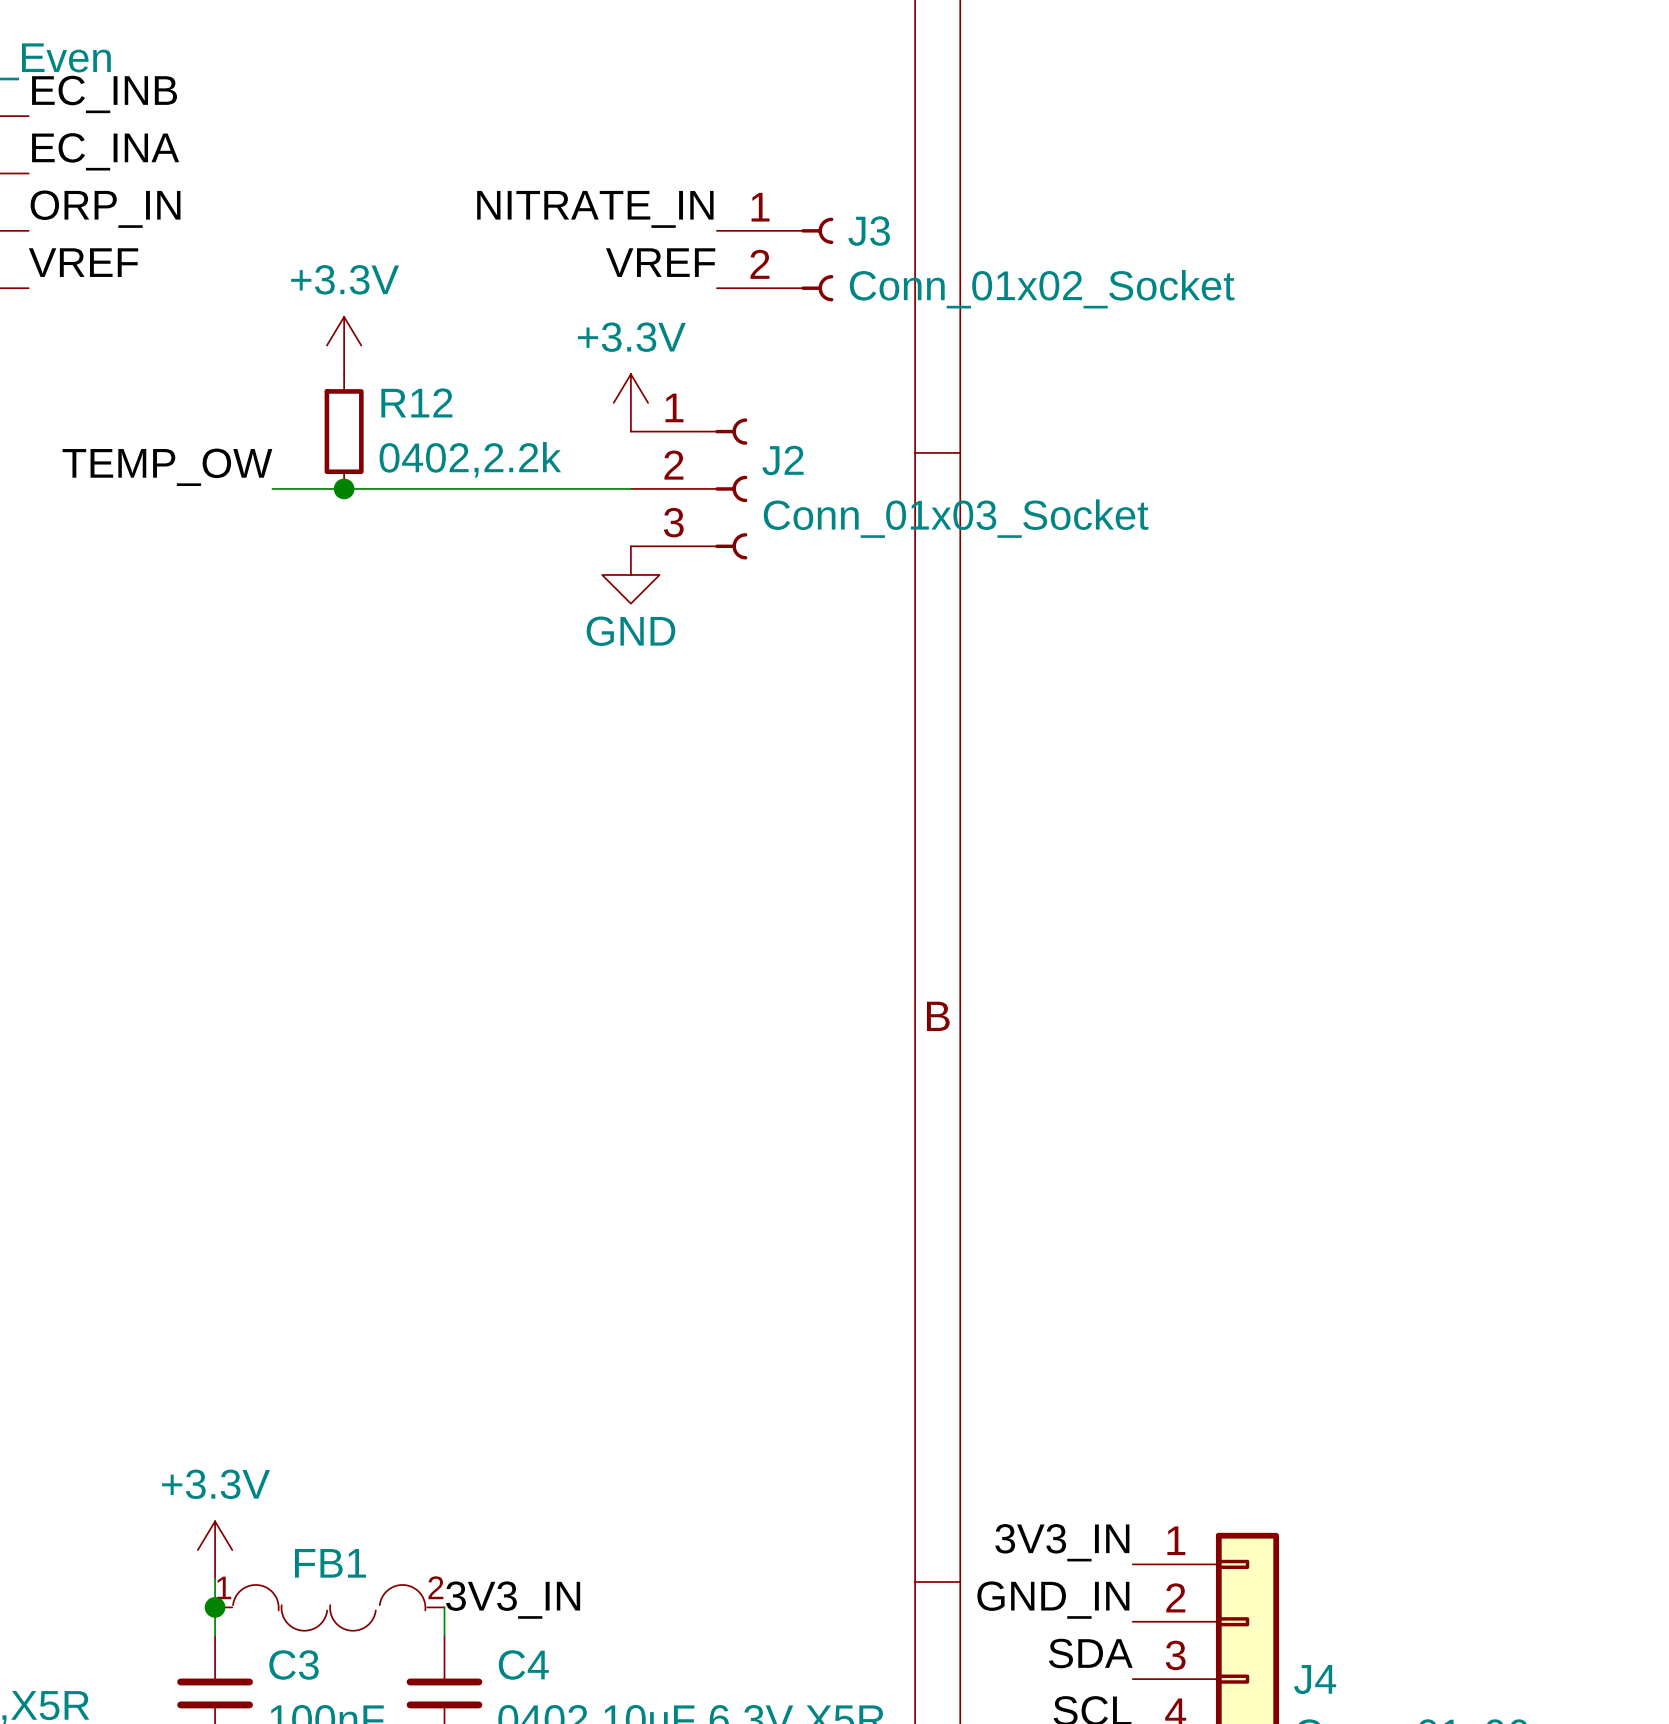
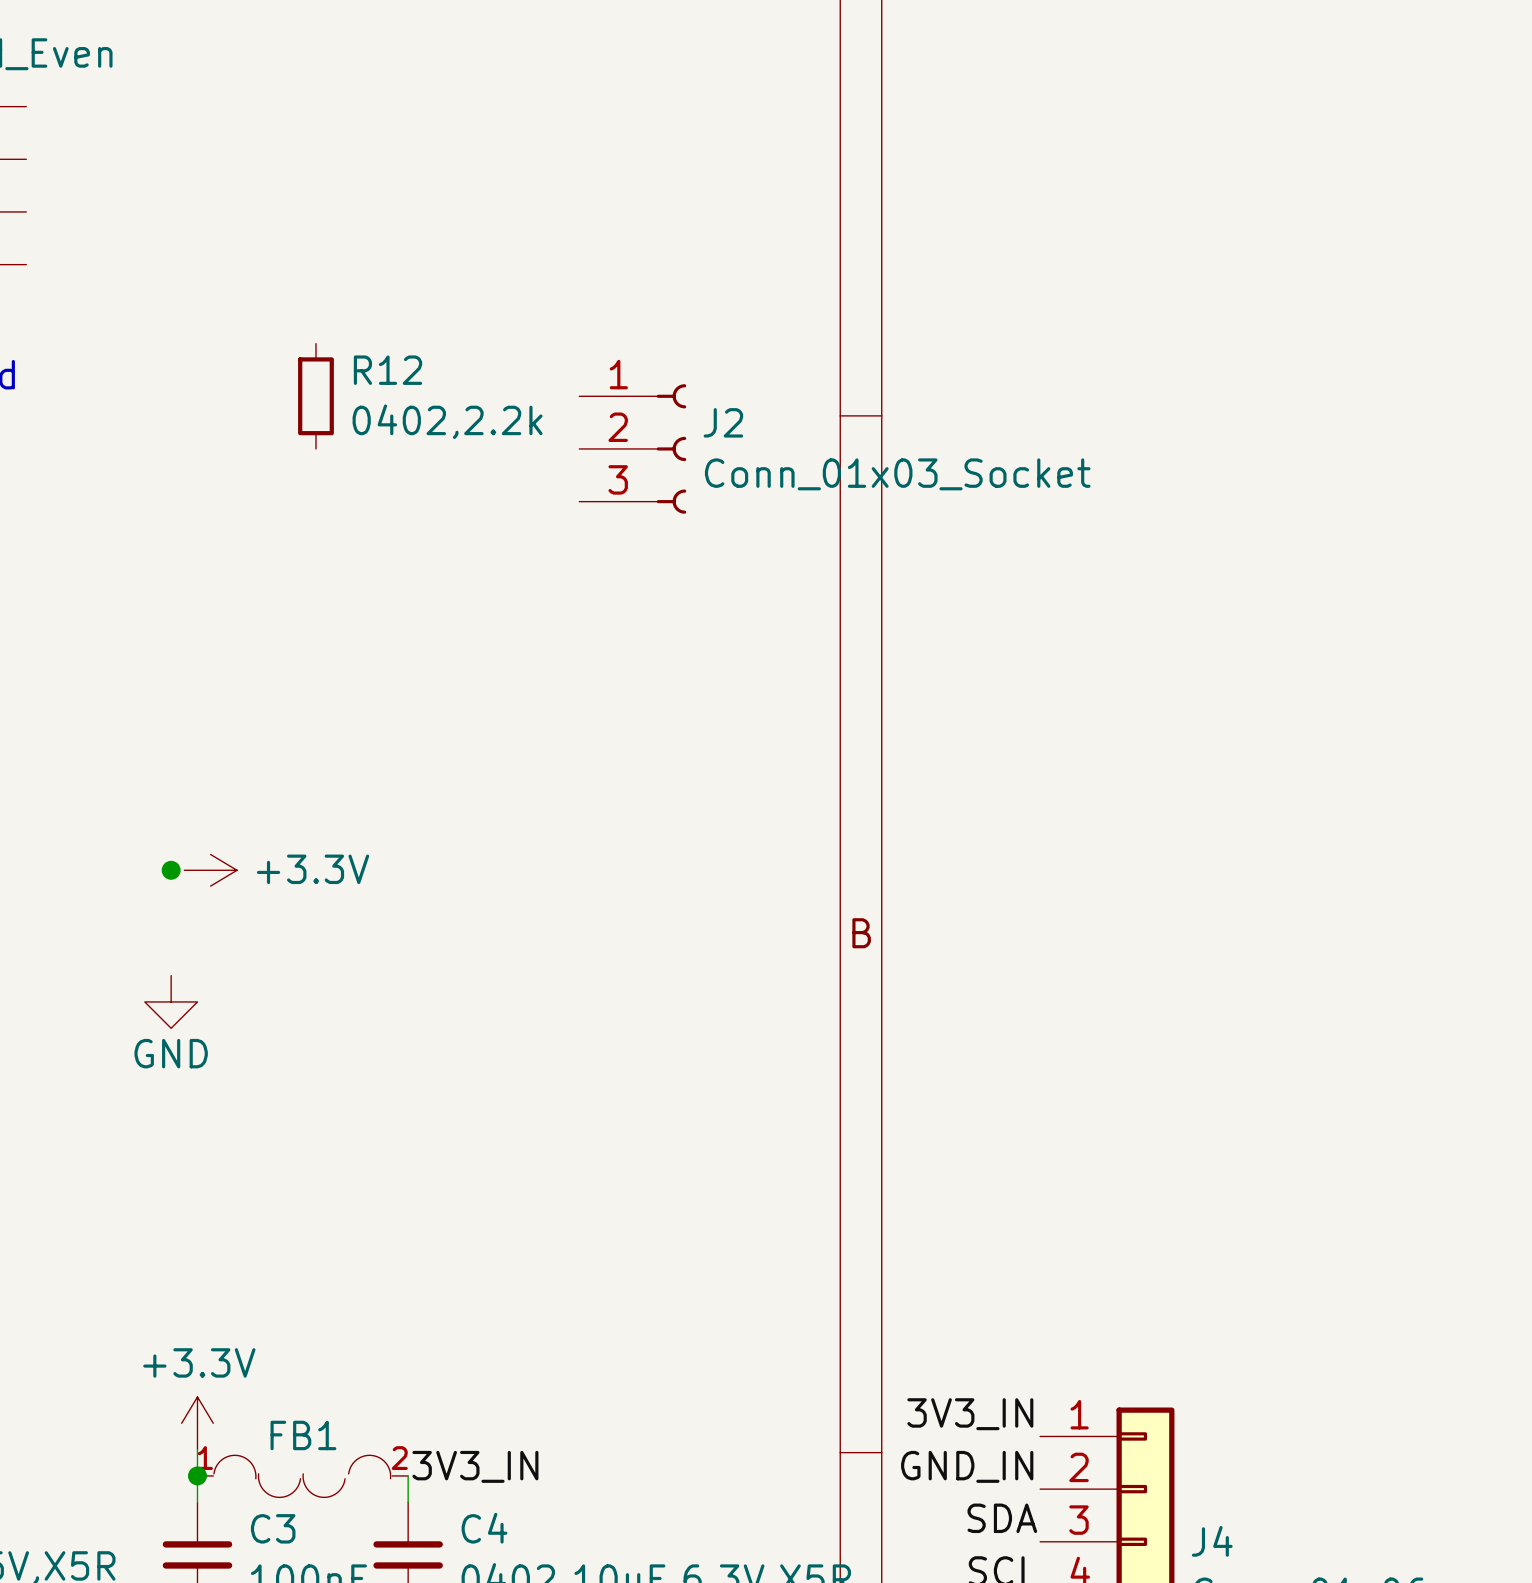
label: EC_INB (104, 94) -> none
label: EC_INA (105, 151) -> none
label: ORP_IN (105, 209) -> none
label: NITRATE_IN (595, 209) -> none
J3: Conn_01x02_Socket (775, 259) -> none
label: VREF (83, 262) -> none
label: VREF (660, 262) -> none
power symbol: +3.3V (344, 345) -> none
power symbol: +3.3V (630, 402) -> none
label: TEMP_OW (167, 467) -> none
wire: (272, 488) (630, 488) -> none
junction: (344, 488) -> none
power symbol: GND (630, 574) -> none
junction: none -> (171, 870)
power symbol: none -> +3.3V (210, 870)
power symbol: none -> GND (171, 1001)

